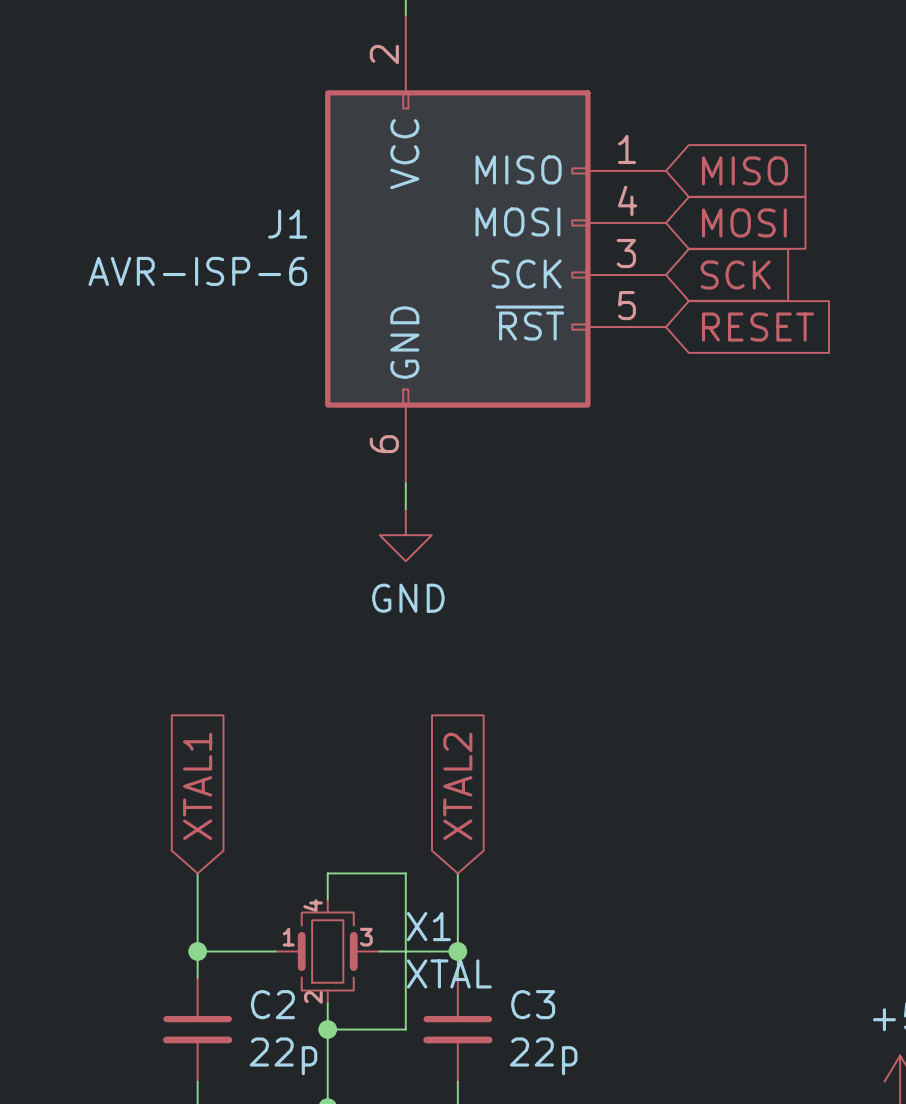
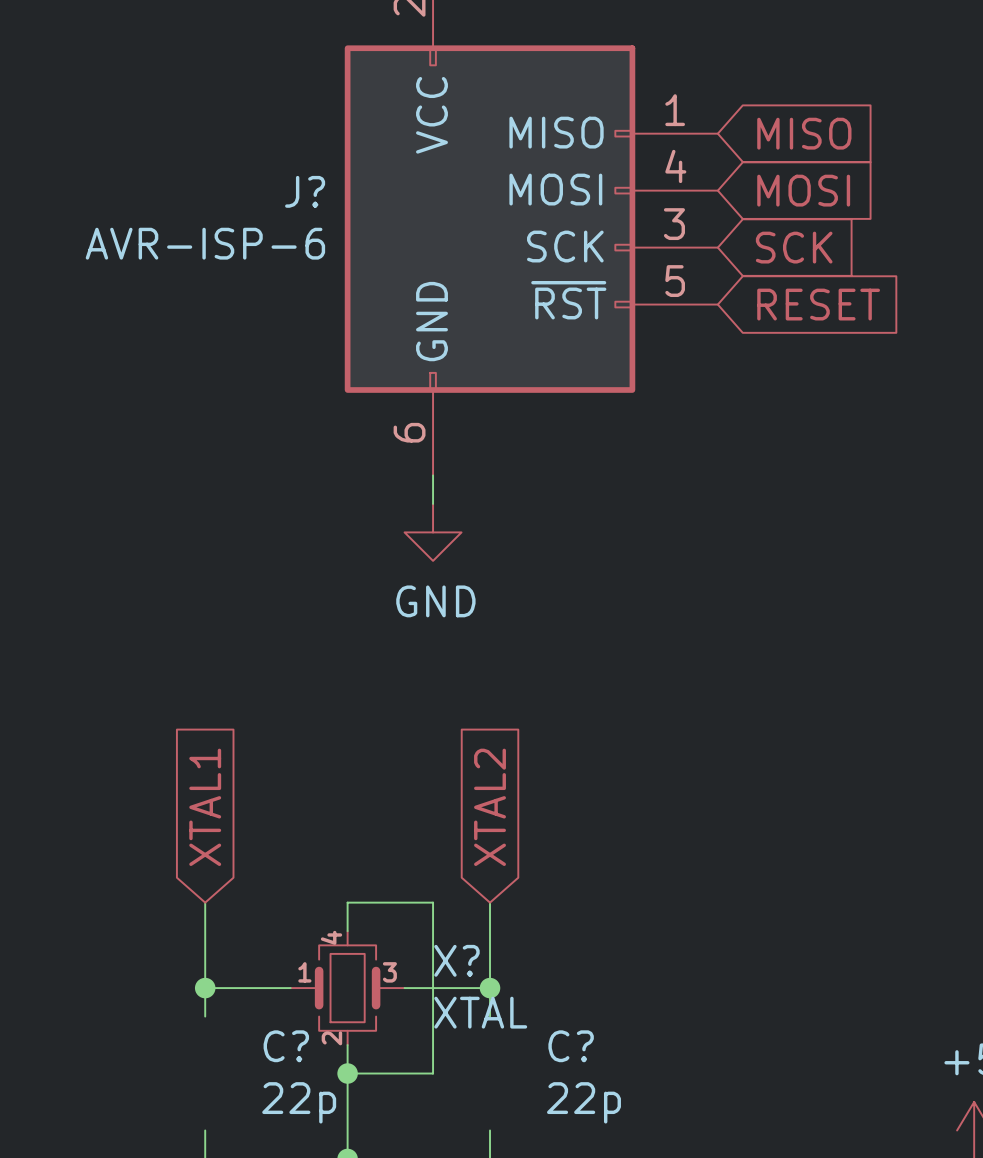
J1 name: J1 (287, 224) -> J? (305, 191)
X1 name: X1 (428, 926) -> X? (456, 960)
C2: 22p (197, 1029) -> none
C3: 22p (457, 1029) -> none
C?: none -> 22p (299, 1076)
C?: none -> 22p (583, 1076)

